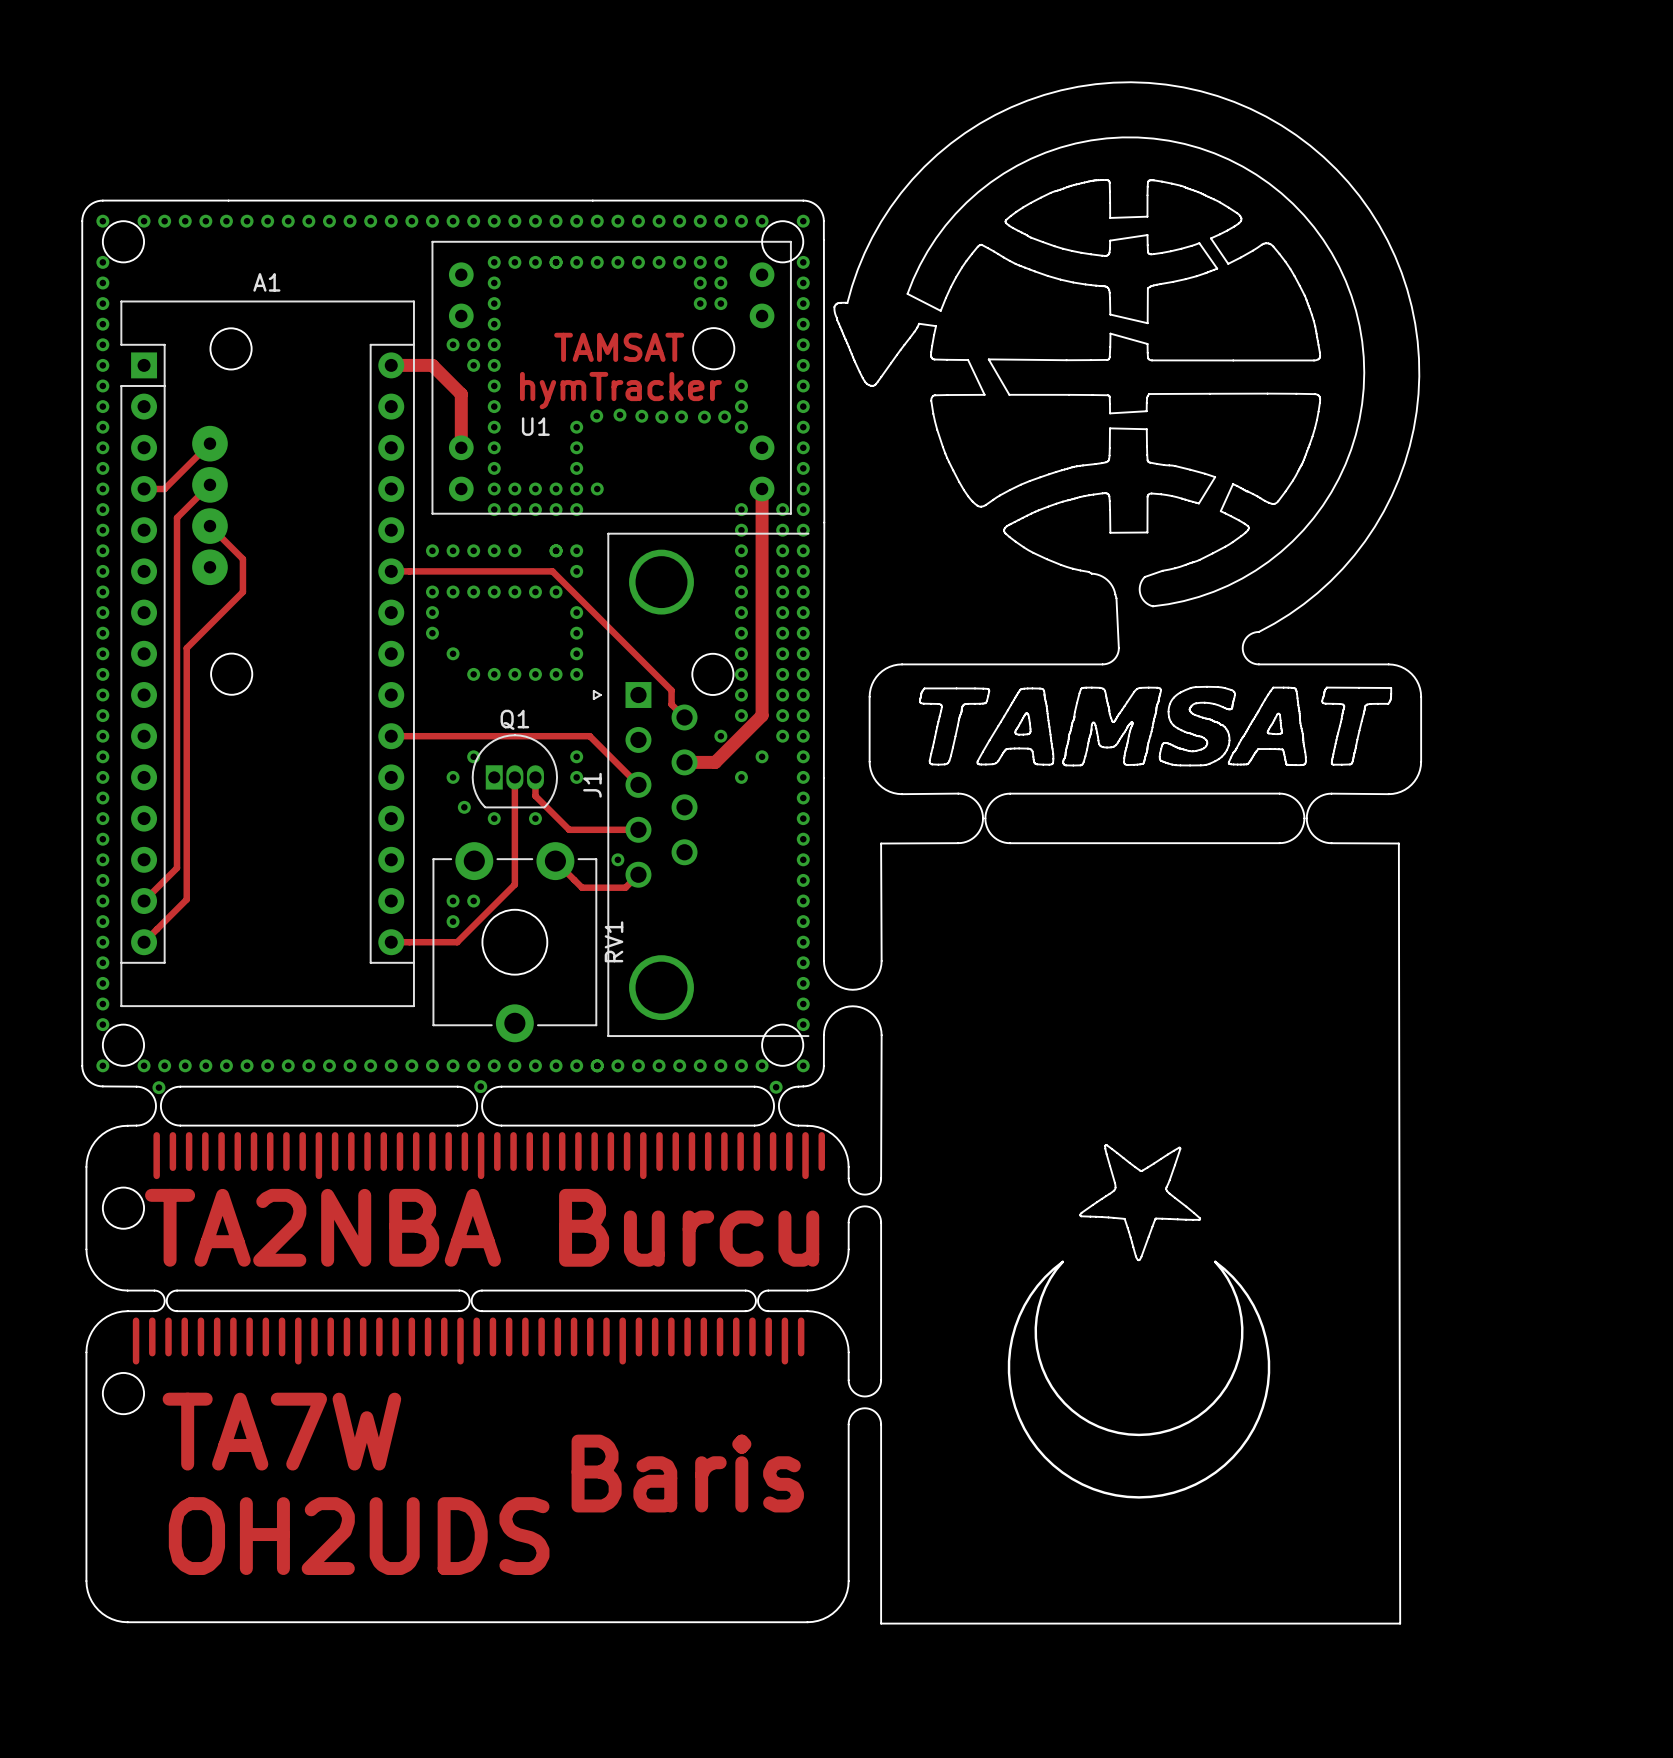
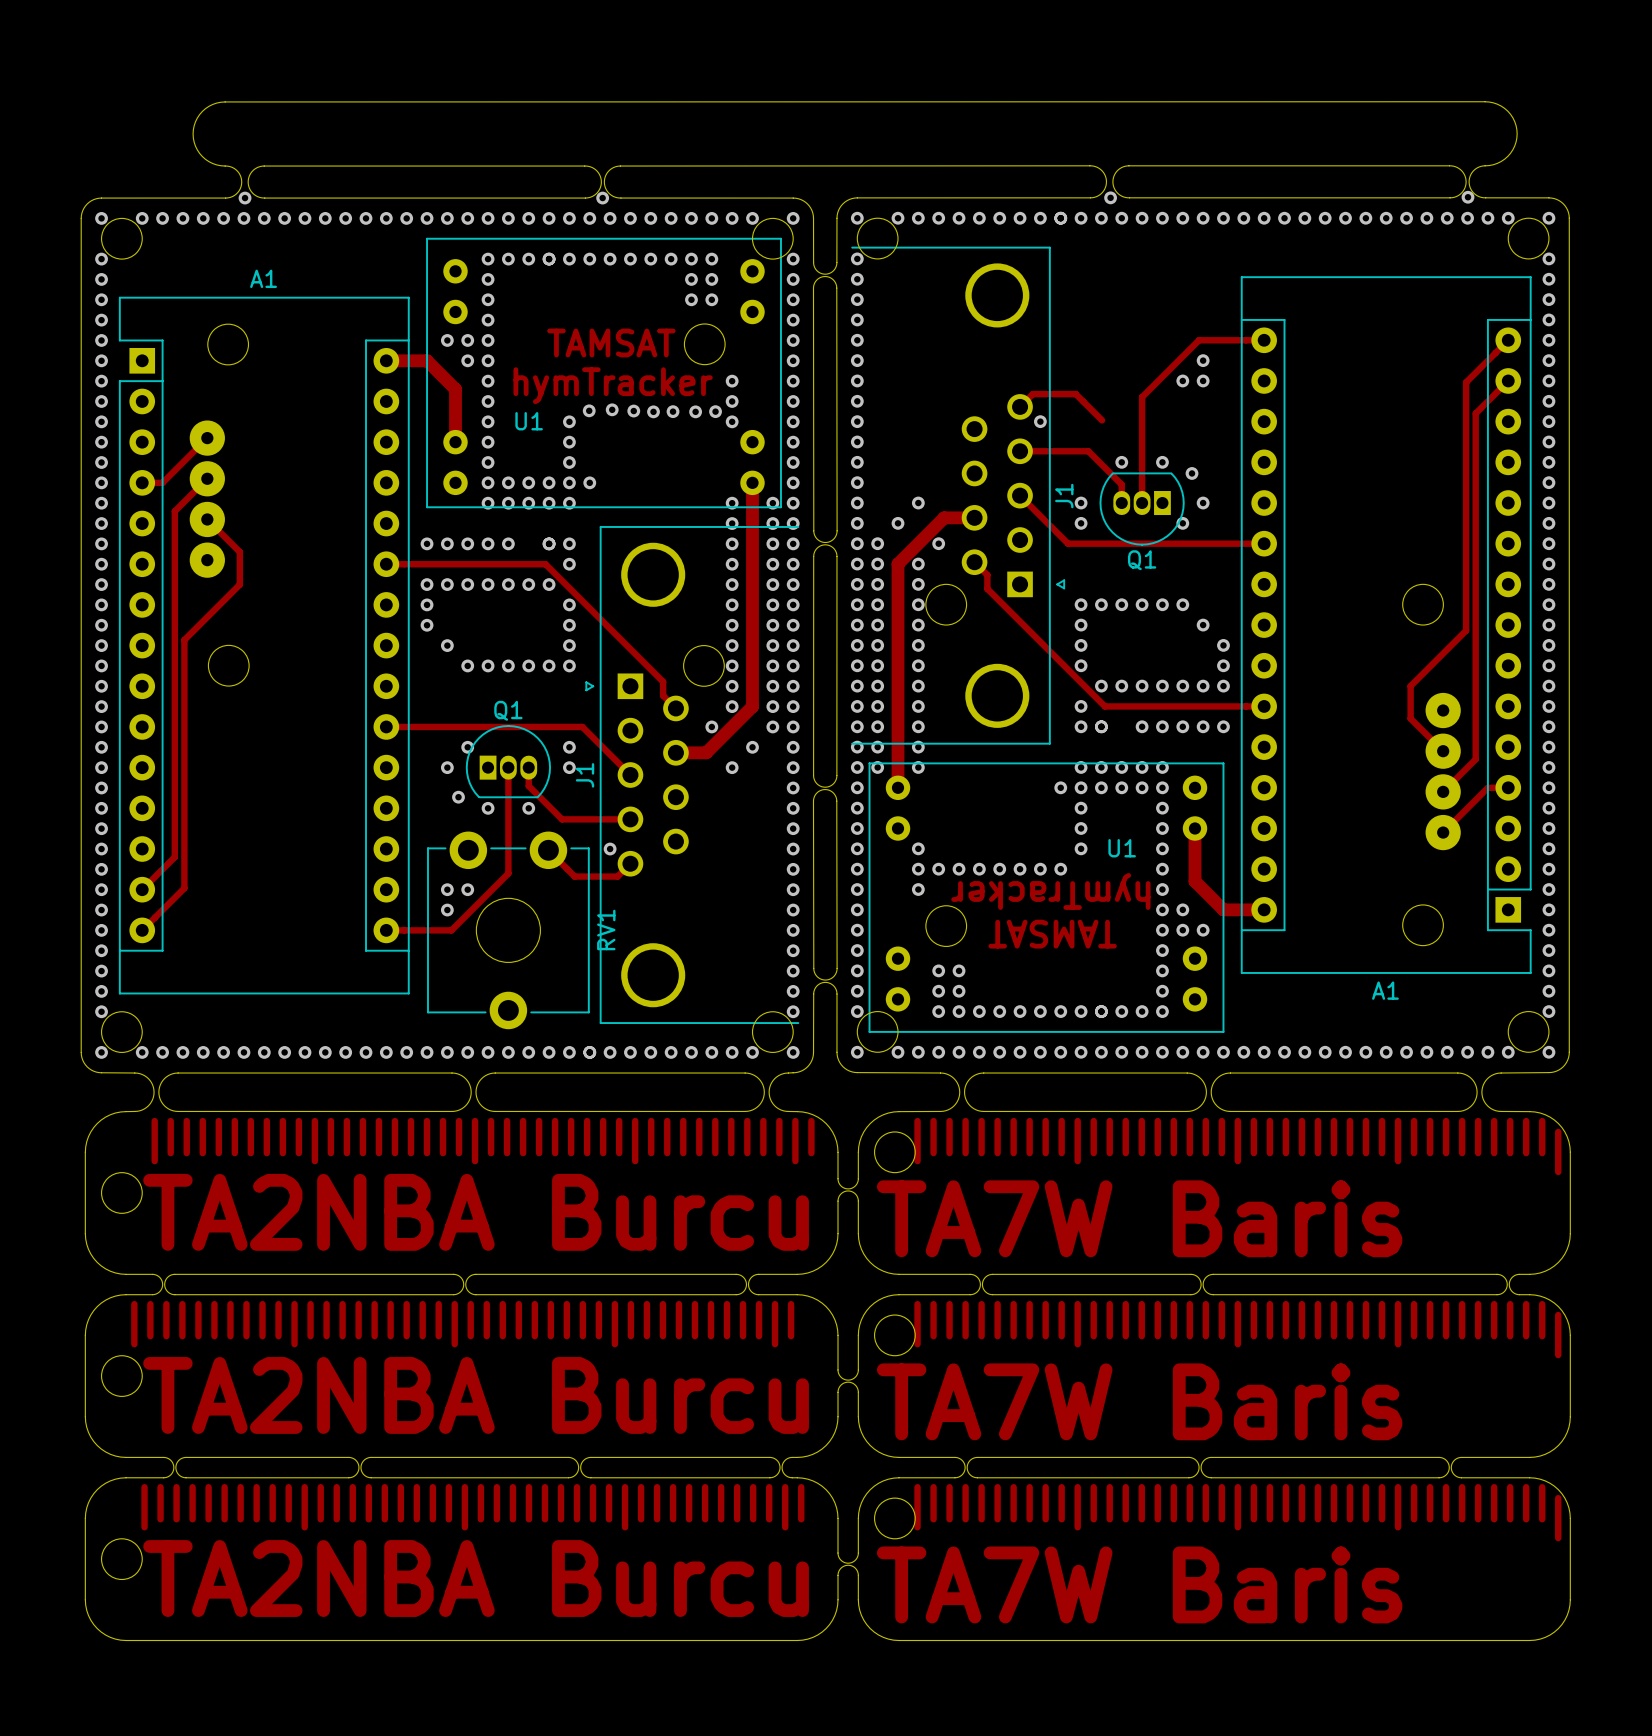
board edge: none -> (1128, 165) (1451, 165) (1461, 170) (1466, 183) (1460, 193) (1450, 197) (1127, 197) (1117, 192) (1112, 182) (1116, 171) (1128, 165)
via: none -> (1467, 197)
board edge: (228, 200) (268, 200) -> (585, 198) (597, 192) (601, 181) (595, 169) (584, 166) (262, 166) (252, 171) (248, 182) (252, 192) (264, 198)
board edge: none -> (225, 198) (233, 196) (238, 190) (241, 181) (239, 174) (232, 167) (216, 164) (205, 159) (195, 146) (193, 133) (194, 125) (199, 114) (209, 106) (220, 102) (1485, 101) (1497, 104) (1507, 111) (1516, 125) (1517, 133) (1514, 146) (1507, 156) (1501, 161) (1474, 169) (1469, 178) (1471, 189) (1476, 195) (1483, 197) (1554, 198) (1565, 205) (1569, 218) (1569, 1052) (1566, 1062) (1556, 1071) (1496, 1073) (1485, 1080) (1481, 1092) (1485, 1103) (1493, 1109) (1534, 1111) (1549, 1117) (1561, 1127) (1568, 1141) (1570, 1233) (1567, 1249) (1558, 1262) (1549, 1268) (1534, 1274) (1515, 1275) (1510, 1279) (1509, 1284) (1510, 1289) (1515, 1293) (1534, 1295) (1549, 1300) (1558, 1306) (1567, 1319) (1570, 1335) (1570, 1416) (1568, 1427) (1561, 1441) (1545, 1454) (1529, 1457) (1460, 1457) (1453, 1461) (1451, 1467) (1454, 1474) (1460, 1477) (1540, 1479) (1554, 1486) (1561, 1493) (1569, 1513) (1569, 1605) (1564, 1620) (1554, 1632) (1540, 1639) (1529, 1640) (899, 1640) (883, 1637) (866, 1624) (858, 1605) (858, 1572) (854, 1567) (848, 1565) (841, 1567) (838, 1572) (837, 1605) (832, 1620) (817, 1635) (802, 1640) (126, 1640) (105, 1635) (90, 1620) (85, 1605) (85, 1561)
via: none -> (245, 198)
board edge: (592, 200) (803, 200) -> none
via: none -> (602, 198)
via: none -> (1110, 197)
round board edge: none -> [856, 217, 899, 260]
round board edge: none -> [1507, 217, 1550, 260]
board edge: (823, 221) (823, 239) -> (813, 218) (813, 265) (818, 272) (826, 274) (833, 270) (836, 263) (837, 212) (842, 203) (852, 198) (1092, 197) (1103, 190) (1106, 179) (1102, 170) (1091, 165) (620, 166) (609, 170) (604, 180) (608, 192) (619, 197) (793, 198)
via: none -> (857, 218)
via: none -> (898, 218)
via: none -> (918, 218)
via: none -> (938, 218)
via: none -> (959, 218)
via: none -> (979, 218)
via: none -> (999, 218)
via: none -> (1020, 218)
via: none -> (1040, 218)
via: none -> (1060, 218)
via: none -> (1081, 218)
via: none -> (1101, 218)
via: none -> (1121, 218)
via: none -> (1142, 218)
via: none -> (1162, 218)
via: none -> (1182, 218)
via: none -> (1203, 218)
via: none -> (1223, 218)
via: none -> (1243, 218)
via: none -> (1264, 218)
via: none -> (1284, 218)
via: none -> (1304, 218)
via: none -> (1325, 218)
via: none -> (1345, 218)
via: none -> (1365, 218)
via: none -> (1386, 218)
via: none -> (1406, 218)
via: none -> (1426, 218)
via: none -> (1447, 218)
via: none -> (1467, 218)
via: none -> (1487, 218)
via: none -> (1508, 218)
via: none -> (1548, 218)
board edge: (823, 239) (823, 960) (829, 978) (845, 988) (856, 989) (867, 985) (875, 978) (880, 968) (881, 843) (963, 842) (977, 833) (982, 821) (979, 805) (966, 794) (897, 793) (885, 789) (876, 781) (872, 774) (869, 761) (869, 692) (876, 677) (885, 668) (902, 664) (1102, 664) (1110, 662) (1116, 656) (1118, 648) (1116, 598) (1111, 584) (1100, 575) (1067, 567) (1033, 552) (1009, 537) (1004, 532) (1004, 528) (1031, 513) (1056, 503) (1080, 497) (1105, 493) (1109, 496) (1110, 532) (1147, 532) (1148, 494) (1166, 495) (1198, 503) (1215, 477) (1175, 466) (1148, 462) (1146, 429) (1109, 428) (1109, 455) (1107, 461) (1072, 467) (1029, 481) (999, 495) (983, 506) (978, 506) (972, 501) (959, 481) (945, 453) (935, 421) (931, 400) (934, 395) (984, 394) (968, 360) (932, 358) (931, 352) (936, 326) (919, 323) (875, 384) (869, 385) (865, 382) (859, 372) (834, 312) (836, 304) (847, 303) (857, 269) (872, 237) (890, 207) (912, 179) (950, 143) (979, 123) (1027, 100) (1061, 90) (1113, 82) (1148, 82) (1183, 87) (1234, 101) (1266, 116) (1310, 145) (1348, 182) (1369, 210) (1395, 256) (1407, 289) (1415, 323) (1419, 358) (1416, 411) (1409, 446) (1398, 479) (1374, 526) (1354, 555) (1330, 581) (1289, 614) (1258, 631) (1249, 635) (1243, 641) (1242, 648) (1247, 659) (1256, 664) (1397, 665) (1404, 668) (1414, 677) (1420, 692) (1420, 765) (1416, 777) (1411, 784) (1404, 789) (1392, 793) (1323, 795) (1310, 805) (1306, 818) (1312, 833) (1326, 842) (1398, 843) (1400, 1623) (881, 1623) (880, 1422) (876, 1413) (864, 1408) (853, 1413) (848, 1424) -> none
board edge: (981, 244) (1015, 263) (1047, 275) (1073, 282) (1106, 286) (1109, 291) (1110, 314) (1147, 323) (1147, 288) (1196, 276) (1217, 268) (1199, 243) (1170, 251) (1150, 254) (1147, 251) (1147, 235) (1110, 240) (1109, 253) (1102, 255) (1072, 250) (1042, 242) (1012, 227) (1006, 223) (1005, 220) (1022, 207) (1053, 191) (1076, 184) (1103, 180) (1109, 182) (1110, 217) (1147, 216) (1148, 182) (1151, 180) (1181, 185) (1198, 192) (1238, 214) (1241, 218) (1239, 222) (1210, 238) (1228, 263) (1263, 243) (1268, 243) (1273, 246) (1290, 268) (1305, 297) (1315, 326) (1320, 354) (1318, 359) (1151, 360) (1148, 357) (1147, 343) (1110, 333) (1109, 356) (1107, 359) (988, 359) (1009, 394) (1108, 395) (1110, 413) (1146, 411) (1149, 394) (1296, 393) (1315, 394) (1319, 396) (1317, 419) (1303, 460) (1292, 480) (1278, 501) (1273, 503) (1268, 502) (1233, 484) (1220, 511) (1244, 523) (1248, 526) (1248, 529) (1229, 544) (1199, 559) (1144, 577) (1140, 583) (1139, 592) (1142, 599) (1149, 604) (1152, 606) (1183, 601) (1228, 585) (1268, 561) (1303, 530) (1331, 492) (1351, 449) (1362, 404) (1363, 357) (1356, 310) (1339, 266) (1314, 227) (1281, 193) (1256, 174) (1228, 159) (1199, 148) (1169, 140) (1122, 137) (1091, 140) (1060, 147) (1017, 165) (990, 182) (966, 202) (945, 225) (927, 251) (907, 293) (940, 310) (962, 267) (980, 244) -> none
via: none -> (857, 258)
via: none -> (1548, 258)
via: none -> (857, 279)
via: none -> (1548, 279)
board edge: none -> (813, 288) (813, 530) (816, 538) (825, 542) (833, 539) (837, 530) (836, 288) (833, 280) (825, 276) (816, 280) (813, 288)
via: none -> (857, 299)
via: none -> (1548, 299)
via: none -> (857, 319)
via: none -> (1548, 319)
via: none -> (857, 340)
track: none -> (1264, 340) (1199, 340) (1142, 397) (1142, 503)
track: none -> (1508, 340) (1466, 382) (1466, 630) (1410, 686) (1410, 718) (1443, 751)
via: none -> (1548, 340)
via: none -> (857, 360)
via: none -> (1203, 360)
via: none -> (1548, 360)
via: none -> (857, 380)
via: none -> (1182, 380)
via: none -> (1203, 380)
track: none -> (1508, 380) (1475, 413) (1475, 759) (1443, 791)
via: none -> (1548, 380)
via: none -> (857, 401)
via: none -> (1548, 401)
track: none -> (1020, 406) (1032, 394) (1075, 394) (1102, 420)
via: none -> (857, 421)
via: none -> (1040, 421)
via: none -> (1548, 421)
via: none -> (857, 441)
via: none -> (1548, 441)
track: none -> (1020, 451) (1088, 451) (1121, 484) (1121, 503)
via: none -> (857, 462)
via: none -> (1121, 462)
via: none -> (1162, 462)
via: none -> (1548, 462)
via: none -> (1192, 473)
via: none -> (857, 482)
via: none -> (1548, 482)
J1: none -> (958, 495)
track: none -> (1020, 495) (1068, 543) (1264, 543)
via: none -> (857, 503)
via: none -> (918, 503)
via: none -> (1081, 503)
via: none -> (1203, 503)
via: none -> (1548, 503)
Q1: none -> (1142, 509)
track: none -> (974, 517) (944, 517) (898, 564) (898, 787)
via: none -> (857, 523)
via: none -> (898, 523)
via: none -> (1081, 523)
via: none -> (1182, 523)
via: none -> (1548, 523)
via: none -> (857, 543)
via: none -> (877, 543)
via: none -> (938, 543)
via: none -> (1548, 543)
board edge: none -> (813, 556) (813, 775) (817, 784) (825, 787) (833, 783) (836, 775) (836, 556) (834, 548) (825, 544) (817, 547) (813, 556)
track: none -> (974, 562) (987, 575) (987, 588) (1104, 706) (1264, 706)
via: none -> (857, 564)
via: none -> (877, 564)
via: none -> (918, 564)
via: none -> (1548, 564)
via: none -> (857, 584)
via: none -> (877, 584)
via: none -> (918, 584)
round board edge: none -> [925, 583, 967, 626]
round board edge: none -> [1402, 583, 1444, 626]
via: none -> (1548, 584)
via: none -> (857, 604)
via: none -> (877, 604)
via: none -> (918, 604)
via: none -> (1081, 604)
via: none -> (1101, 604)
via: none -> (1121, 604)
via: none -> (1142, 604)
via: none -> (1162, 604)
via: none -> (1182, 604)
via: none -> (1548, 604)
via: none -> (857, 625)
via: none -> (877, 625)
via: none -> (918, 625)
via: none -> (1081, 625)
via: none -> (1203, 625)
A1: none -> (1386, 625)
via: none -> (1548, 625)
via: none -> (857, 645)
via: none -> (877, 645)
via: none -> (918, 645)
via: none -> (1081, 645)
via: none -> (1223, 645)
via: none -> (1548, 645)
via: none -> (857, 665)
via: none -> (877, 665)
via: none -> (918, 665)
via: none -> (1081, 665)
via: none -> (1223, 665)
via: none -> (1548, 665)
board edge: (1207, 686) (1191, 687) (1178, 693) (1171, 700) (1168, 711) (1169, 719) (1173, 725) (1184, 731) (1203, 738) (1207, 741) (1206, 745) (1201, 749) (1191, 751) (1164, 743) (1160, 753) (1161, 760) (1175, 765) (1205, 764) (1219, 758) (1225, 751) (1229, 737) (1225, 727) (1217, 722) (1194, 714) (1189, 709) (1194, 703) (1204, 702) (1231, 709) (1234, 693) (1224, 688) (1207, 686) -> none
board edge: (1086, 687) (1104, 689) (1113, 722) (1137, 689) (1160, 689) (1143, 763) (1127, 765) (1124, 762) (1131, 722) (1116, 745) (1107, 747) (1099, 744) (1093, 722) (1082, 763) (1063, 764) (1079, 693) (1081, 688) (1086, 687) -> none
board edge: (1273, 687) (1233, 753) (1229, 763) (1247, 764) (1258, 749) (1282, 749) (1286, 764) (1301, 765) (1305, 763) (1295, 689) (1273, 687) -> none
board edge: (1326, 687) (1322, 702) (1344, 706) (1331, 763) (1350, 764) (1365, 706) (1369, 704) (1388, 703) (1390, 698) (1391, 688) (1326, 687) -> none
board edge: (924, 688) (921, 693) (920, 702) (939, 704) (941, 706) (929, 762) (932, 764) (945, 764) (950, 758) (962, 706) (965, 704) (985, 703) (989, 689) (924, 688) -> none
board edge: (1027, 688) (1021, 689) (1017, 693) (982, 751) (978, 763) (994, 763) (1006, 749) (1019, 748) (1031, 749) (1035, 763) (1052, 763) (1052, 751) (1043, 690) (1040, 688) (1027, 688) -> none
via: none -> (857, 686)
via: none -> (877, 686)
via: none -> (918, 686)
via: none -> (1101, 686)
via: none -> (1121, 686)
via: none -> (1142, 686)
via: none -> (1162, 686)
via: none -> (1182, 686)
via: none -> (1203, 686)
via: none -> (1223, 686)
via: none -> (1548, 686)
board edge: (1026, 713) (1028, 716) (1030, 732) (1016, 734) (1015, 730) (1026, 713) -> none
board edge: (1278, 713) (1281, 732) (1268, 733) (1269, 728) (1278, 713) -> none
via: none -> (857, 706)
via: none -> (877, 706)
via: none -> (918, 706)
via: none -> (1081, 706)
via: none -> (1548, 706)
via: none -> (857, 726)
via: none -> (877, 726)
via: none -> (918, 726)
via: none -> (1081, 726)
via: none -> (1101, 726)
via: none -> (1142, 726)
via: none -> (1162, 726)
via: none -> (1182, 726)
via: none -> (1203, 726)
via: none -> (1223, 726)
via: none -> (1548, 726)
via: none -> (857, 747)
via: none -> (877, 747)
via: none -> (918, 747)
via: none -> (1548, 747)
via: none -> (857, 767)
via: none -> (877, 767)
via: none -> (918, 767)
via: none -> (1081, 767)
via: none -> (1101, 767)
via: none -> (1121, 767)
via: none -> (1142, 767)
via: none -> (1162, 767)
via: none -> (1548, 767)
part: none -> (1443, 771)
board edge: (1279, 793) (1007, 793) (996, 797) (990, 802) (986, 810) (985, 821) (992, 835) (1007, 843) (1282, 843) (1292, 839) (1299, 833) (1303, 826) (1304, 815) (1297, 800) (1287, 794) (1279, 793) -> none
via: none -> (857, 787)
via: none -> (1060, 787)
via: none -> (1081, 787)
via: none -> (1101, 787)
via: none -> (1121, 787)
via: none -> (1142, 787)
via: none -> (1162, 787)
track: none -> (1508, 787) (1487, 787) (1443, 832)
via: none -> (1548, 787)
board edge: none -> (813, 801) (813, 969) (817, 977) (826, 979) (834, 976) (837, 968) (836, 799) (832, 792) (825, 789) (817, 792) (813, 801)
via: none -> (857, 808)
via: none -> (1081, 808)
via: none -> (1162, 808)
via: none -> (1548, 808)
via: none -> (857, 828)
via: none -> (1081, 828)
via: none -> (1162, 828)
track: none -> (1195, 828) (1195, 881) (1223, 909) (1264, 909)
via: none -> (1548, 828)
via: none -> (857, 848)
via: none -> (918, 848)
via: none -> (1081, 848)
via: none -> (1162, 848)
via: none -> (1548, 848)
via: none -> (857, 869)
via: none -> (918, 869)
via: none -> (938, 869)
via: none -> (959, 869)
via: none -> (979, 869)
via: none -> (999, 869)
via: none -> (1020, 869)
via: none -> (1040, 869)
via: none -> (1060, 869)
via: none -> (1162, 869)
via: none -> (1548, 869)
via: none -> (857, 889)
via: none -> (918, 889)
via: none -> (1162, 889)
via: none -> (1548, 889)
text: none -> hymTracker (1050, 891)
U1: none -> (1046, 897)
round board edge: none -> [925, 905, 967, 947]
round board edge: none -> [1402, 904, 1444, 947]
via: none -> (857, 909)
via: none -> (1162, 909)
via: none -> (1182, 909)
via: none -> (1548, 909)
via: none -> (857, 930)
via: none -> (1162, 930)
via: none -> (1182, 930)
via: none -> (1203, 930)
via: none -> (1548, 930)
text: none -> TAMSAT (1052, 934)
via: none -> (857, 950)
via: none -> (1162, 950)
via: none -> (1548, 950)
via: none -> (857, 970)
via: none -> (938, 970)
via: none -> (959, 970)
via: none -> (1162, 970)
via: none -> (1548, 970)
via: none -> (857, 991)
via: none -> (938, 991)
via: none -> (959, 991)
via: none -> (1162, 991)
via: none -> (1548, 991)
round board edge: none -> [856, 1011, 899, 1053]
via: none -> (857, 1011)
via: none -> (938, 1011)
via: none -> (959, 1011)
via: none -> (979, 1011)
via: none -> (999, 1011)
via: none -> (1020, 1011)
via: none -> (1040, 1011)
via: none -> (1060, 1011)
via: none -> (1081, 1011)
via: none -> (1101, 1011)
via: none -> (1121, 1011)
via: none -> (1142, 1011)
via: none -> (1162, 1011)
round board edge: none -> [1507, 1011, 1550, 1053]
via: none -> (1548, 1011)
board edge: (823, 1065) (824, 1031) (832, 1014) (841, 1008) (852, 1006) (863, 1008) (873, 1014) (879, 1024) (881, 1035) (880, 1180) (876, 1189) (864, 1194) (853, 1189) (848, 1178) -> (813, 1052) (814, 991) (819, 983) (828, 982) (834, 986) (836, 991) (837, 1054) (839, 1062) (844, 1068) (857, 1072) (943, 1073) (952, 1076) (959, 1087) (957, 1101) (947, 1109) (893, 1111) (883, 1114) (870, 1123) (859, 1141) (858, 1180) (853, 1187) (845, 1188) (839, 1183) (838, 1163)
via: none -> (857, 1052)
via: none -> (898, 1052)
via: none -> (918, 1052)
via: none -> (938, 1052)
via: none -> (959, 1052)
via: none -> (979, 1052)
via: none -> (999, 1052)
via: none -> (1020, 1052)
via: none -> (1040, 1052)
via: none -> (1060, 1052)
via: none -> (1081, 1052)
via: none -> (1101, 1052)
via: none -> (1121, 1052)
via: none -> (1142, 1052)
via: none -> (1162, 1052)
via: none -> (1182, 1052)
via: none -> (1203, 1052)
via: none -> (1223, 1052)
via: none -> (1243, 1052)
via: none -> (1264, 1052)
via: none -> (1284, 1052)
via: none -> (1304, 1052)
via: none -> (1325, 1052)
via: none -> (1345, 1052)
via: none -> (1365, 1052)
via: none -> (1386, 1052)
via: none -> (1406, 1052)
via: none -> (1426, 1052)
via: none -> (1447, 1052)
via: none -> (1467, 1052)
via: none -> (1487, 1052)
via: none -> (1508, 1052)
via: none -> (1548, 1052)
via: (480, 1086) -> none
board edge: none -> (983, 1073) (1189, 1073) (1202, 1080) (1206, 1094) (1200, 1105) (1189, 1111) (981, 1111) (968, 1103) (964, 1092) (970, 1078) (983, 1073)
board edge: none -> (1230, 1073) (1460, 1073) (1473, 1080) (1476, 1094) (1471, 1105) (1460, 1111) (1227, 1111) (1215, 1103) (1211, 1092) (1216, 1078) (1230, 1073)
via: (158, 1087) -> none
via: (776, 1087) -> none
track: none -> (917, 1121) (917, 1161)
track: none -> (933, 1121) (933, 1153)
track: none -> (949, 1121) (949, 1153)
track: none -> (965, 1121) (965, 1153)
track: none -> (981, 1121) (981, 1153)
track: none -> (997, 1121) (997, 1153)
track: none -> (1013, 1121) (1013, 1153)
track: none -> (1029, 1121) (1029, 1153)
track: none -> (1045, 1121) (1045, 1153)
track: none -> (1061, 1121) (1061, 1153)
track: none -> (1077, 1121) (1077, 1161)
track: none -> (1093, 1121) (1093, 1153)
track: none -> (1109, 1121) (1109, 1153)
track: none -> (1125, 1121) (1125, 1153)
track: none -> (1141, 1121) (1141, 1153)
track: none -> (1157, 1121) (1157, 1153)
track: none -> (1173, 1121) (1173, 1153)
track: none -> (1189, 1121) (1189, 1153)
track: none -> (1205, 1121) (1205, 1153)
track: none -> (1221, 1121) (1221, 1153)
track: none -> (1237, 1121) (1237, 1161)
track: none -> (1253, 1121) (1253, 1153)
track: none -> (1269, 1121) (1269, 1153)
track: none -> (1285, 1121) (1285, 1153)
track: none -> (1301, 1121) (1301, 1153)
track: none -> (1317, 1121) (1317, 1153)
track: none -> (1333, 1121) (1333, 1153)
track: none -> (1350, 1121) (1350, 1153)
track: none -> (1366, 1121) (1366, 1153)
track: none -> (1382, 1121) (1382, 1153)
track: none -> (1398, 1121) (1398, 1161)
track: none -> (1414, 1121) (1414, 1153)
track: none -> (1430, 1121) (1430, 1153)
track: none -> (1446, 1121) (1446, 1153)
track: none -> (1462, 1121) (1462, 1153)
track: none -> (1478, 1121) (1478, 1153)
track: none -> (1494, 1121) (1494, 1153)
track: none -> (1510, 1121) (1510, 1153)
track: none -> (1526, 1121) (1526, 1153)
track: none -> (1542, 1121) (1542, 1153)
round board edge: none -> [874, 1131, 916, 1174]
board edge: (1106, 1145) (1141, 1170) (1180, 1148) (1166, 1189) (1200, 1219) (1155, 1218) (1139, 1260) (1135, 1256) (1124, 1218) (1080, 1215) (1115, 1188) (1105, 1151) (1105, 1146) (1105, 1145) (1106, 1145) -> none
track: none -> (1558, 1131) (1558, 1172)
board edge: (848, 1222) (853, 1211) (864, 1206) (876, 1211) (881, 1222) (880, 1384) (874, 1393) (862, 1396) (853, 1391) (848, 1380) -> (838, 1207) (838, 1197) (843, 1192) (850, 1191) (856, 1196) (859, 1244) (866, 1258) (878, 1268) (899, 1274) (971, 1274) (978, 1278) (980, 1284) (978, 1290) (971, 1294) (899, 1294) (878, 1300) (866, 1310) (859, 1324) (858, 1371) (856, 1376) (849, 1380) (841, 1378) (838, 1372) (838, 1362)
text: none -> TA7W Baris (1139, 1218)
board edge: (1062, 1261) (1045, 1277) (1030, 1295) (1019, 1315) (1012, 1338) (1009, 1361) (1010, 1384) (1019, 1418) (1030, 1438) (1044, 1457) (1072, 1478) (1093, 1489) (1115, 1495) (1150, 1496) (1173, 1492) (1195, 1484) (1215, 1472) (1233, 1457) (1247, 1438) (1258, 1418) (1265, 1396) (1269, 1372) (1267, 1349) (1262, 1326) (1247, 1295) (1232, 1277) (1215, 1261) (1227, 1278) (1236, 1297) (1241, 1317) (1242, 1338) (1238, 1358) (1231, 1377) (1213, 1403) (1197, 1416) (1169, 1430) (1139, 1434) (1118, 1432) (1089, 1422) (1072, 1410) (1051, 1386) (1042, 1368) (1035, 1338) (1038, 1307) (1045, 1287) (1062, 1261) -> none
board edge: none -> (992, 1274) (1190, 1274) (1198, 1277) (1201, 1284) (1198, 1291) (1190, 1294) (992, 1294) (985, 1291) (982, 1284) (985, 1277) (992, 1274)
board edge: none -> (1213, 1274) (1497, 1274) (1504, 1277) (1507, 1284) (1504, 1291) (1497, 1294) (1213, 1294) (1206, 1291) (1203, 1284) (1206, 1277) (1213, 1274)
track: none -> (917, 1304) (917, 1344)
track: none -> (933, 1304) (933, 1336)
track: none -> (949, 1304) (949, 1336)
track: none -> (965, 1304) (965, 1336)
track: none -> (981, 1304) (981, 1336)
track: none -> (997, 1304) (997, 1336)
track: none -> (1013, 1304) (1013, 1336)
track: none -> (1029, 1304) (1029, 1336)
track: none -> (1045, 1304) (1045, 1336)
track: none -> (1061, 1304) (1061, 1336)
track: none -> (1077, 1304) (1077, 1344)
track: none -> (1093, 1304) (1093, 1336)
track: none -> (1109, 1304) (1109, 1336)
track: none -> (1125, 1304) (1125, 1336)
track: none -> (1141, 1304) (1141, 1336)
track: none -> (1157, 1304) (1157, 1336)
track: none -> (1173, 1304) (1173, 1336)
track: none -> (1189, 1304) (1189, 1336)
track: none -> (1205, 1304) (1205, 1336)
track: none -> (1221, 1304) (1221, 1336)
track: none -> (1237, 1304) (1237, 1344)
track: none -> (1253, 1304) (1253, 1336)
track: none -> (1269, 1304) (1269, 1336)
track: none -> (1285, 1304) (1285, 1336)
track: none -> (1301, 1304) (1301, 1336)
track: none -> (1317, 1304) (1317, 1336)
track: none -> (1333, 1304) (1333, 1336)
track: none -> (1350, 1304) (1350, 1336)
track: none -> (1366, 1304) (1366, 1336)
track: none -> (1382, 1304) (1382, 1336)
track: none -> (1398, 1304) (1398, 1344)
track: none -> (1414, 1304) (1414, 1336)
track: none -> (1430, 1304) (1430, 1336)
track: none -> (1446, 1304) (1446, 1336)
track: none -> (1462, 1304) (1462, 1336)
track: none -> (1478, 1304) (1478, 1336)
track: none -> (1494, 1304) (1494, 1336)
track: none -> (1510, 1304) (1510, 1336)
track: none -> (1526, 1304) (1526, 1336)
track: none -> (1542, 1304) (1542, 1336)
round board edge: none -> [874, 1314, 916, 1357]
track: none -> (1558, 1315) (1558, 1355)
text: none -> TA2NBA Burcu (476, 1395)
text: none -> TA7W Baris (1139, 1401)
text: TA7W (281, 1431) -> none
board edge: (86, 1434) (86, 1537) -> (85, 1416) (90, 1437) (105, 1451) (120, 1457) (166, 1457) (171, 1461) (173, 1467) (171, 1473) (166, 1477) (120, 1478) (105, 1483) (90, 1498) (85, 1518)
board edge: (848, 1434) (848, 1537) -> (838, 1416) (834, 1432) (826, 1445) (812, 1454) (787, 1458) (782, 1467) (787, 1476) (812, 1480) (826, 1489) (834, 1502) (838, 1518)
text: Baris (687, 1473) -> none
board edge: none -> (186, 1457) (348, 1457) (355, 1460) (358, 1467) (355, 1474) (348, 1477) (186, 1477) (178, 1474) (175, 1467) (178, 1460) (186, 1457)
board edge: none -> (371, 1457) (568, 1457) (575, 1460) (578, 1467) (575, 1474) (568, 1477) (371, 1477) (363, 1474) (360, 1467) (363, 1460) (371, 1457)
board edge: none -> (590, 1457) (769, 1457) (777, 1460) (780, 1467) (777, 1474) (769, 1477) (590, 1477) (583, 1474) (580, 1467) (583, 1460) (590, 1457)
board edge: none -> (977, 1457) (1188, 1457) (1196, 1460) (1199, 1467) (1196, 1474) (1188, 1477) (977, 1477) (970, 1474) (967, 1467) (970, 1460) (977, 1457)
board edge: none -> (1211, 1457) (1439, 1457) (1446, 1460) (1449, 1467) (1446, 1474) (1439, 1477) (1211, 1477) (1204, 1474) (1201, 1467) (1204, 1460) (1211, 1457)
track: none -> (144, 1487) (144, 1527)
track: none -> (160, 1487) (160, 1519)
track: none -> (176, 1487) (176, 1519)
track: none -> (192, 1487) (192, 1519)
track: none -> (208, 1487) (208, 1519)
track: none -> (224, 1487) (224, 1519)
track: none -> (240, 1487) (240, 1519)
track: none -> (256, 1487) (256, 1519)
track: none -> (272, 1487) (272, 1519)
track: none -> (288, 1487) (288, 1519)
track: none -> (304, 1487) (304, 1527)
track: none -> (320, 1487) (320, 1519)
track: none -> (336, 1487) (336, 1519)
track: none -> (352, 1487) (352, 1519)
track: none -> (368, 1487) (368, 1519)
track: none -> (384, 1487) (384, 1519)
track: none -> (400, 1487) (400, 1519)
track: none -> (416, 1487) (416, 1519)
track: none -> (432, 1487) (432, 1519)
track: none -> (448, 1487) (448, 1519)
track: none -> (464, 1487) (464, 1527)
track: none -> (480, 1487) (480, 1519)
track: none -> (496, 1487) (496, 1519)
track: none -> (512, 1487) (512, 1519)
track: none -> (528, 1487) (528, 1519)
track: none -> (544, 1487) (544, 1519)
track: none -> (560, 1487) (560, 1519)
track: none -> (577, 1487) (577, 1519)
track: none -> (593, 1487) (593, 1519)
track: none -> (609, 1487) (609, 1519)
track: none -> (625, 1487) (625, 1527)
track: none -> (641, 1487) (641, 1519)
track: none -> (657, 1487) (657, 1519)
track: none -> (673, 1487) (673, 1519)
track: none -> (689, 1487) (689, 1519)
track: none -> (705, 1487) (705, 1519)
track: none -> (721, 1487) (721, 1519)
track: none -> (737, 1487) (737, 1519)
track: none -> (753, 1487) (753, 1519)
track: none -> (769, 1487) (769, 1519)
track: none -> (785, 1487) (785, 1527)
track: none -> (801, 1487) (801, 1519)
track: none -> (917, 1487) (917, 1527)
track: none -> (933, 1487) (933, 1519)
track: none -> (949, 1487) (949, 1519)
track: none -> (965, 1487) (965, 1519)
track: none -> (981, 1487) (981, 1519)
track: none -> (997, 1487) (997, 1519)
track: none -> (1013, 1487) (1013, 1519)
track: none -> (1029, 1487) (1029, 1519)
track: none -> (1045, 1487) (1045, 1519)
track: none -> (1061, 1487) (1061, 1519)
track: none -> (1077, 1487) (1077, 1527)
track: none -> (1093, 1487) (1093, 1519)
track: none -> (1109, 1487) (1109, 1519)
track: none -> (1125, 1487) (1125, 1519)
track: none -> (1141, 1487) (1141, 1519)
track: none -> (1157, 1487) (1157, 1519)
track: none -> (1173, 1487) (1173, 1519)
track: none -> (1189, 1487) (1189, 1519)
track: none -> (1205, 1487) (1205, 1519)
track: none -> (1221, 1487) (1221, 1519)
track: none -> (1237, 1487) (1237, 1527)
track: none -> (1253, 1487) (1253, 1519)
track: none -> (1269, 1487) (1269, 1519)
track: none -> (1285, 1487) (1285, 1519)
track: none -> (1301, 1487) (1301, 1519)
track: none -> (1317, 1487) (1317, 1519)
track: none -> (1333, 1487) (1333, 1519)
track: none -> (1350, 1487) (1350, 1519)
track: none -> (1366, 1487) (1366, 1519)
track: none -> (1382, 1487) (1382, 1519)
track: none -> (1398, 1487) (1398, 1527)
track: none -> (1414, 1487) (1414, 1519)
track: none -> (1430, 1487) (1430, 1519)
track: none -> (1446, 1487) (1446, 1519)
track: none -> (1462, 1487) (1462, 1519)
track: none -> (1478, 1487) (1478, 1519)
track: none -> (1494, 1487) (1494, 1519)
track: none -> (1510, 1487) (1510, 1519)
track: none -> (1526, 1487) (1526, 1519)
track: none -> (1542, 1487) (1542, 1519)
round board edge: none -> [874, 1497, 916, 1540]
track: none -> (1558, 1498) (1558, 1538)
text: OH2UDS (359, 1536) -> none
round board edge: none -> [101, 1538, 143, 1580]
board edge: (848, 1572) (847, 1591) (840, 1606) (828, 1616) (807, 1622) (127, 1622) (111, 1619) (98, 1610) (89, 1596) (86, 1581) -> (838, 1553) (840, 1559) (845, 1562) (852, 1562) (856, 1558) (859, 1507) (863, 1498) (874, 1486) (893, 1478) (957, 1477) (963, 1473) (965, 1467) (963, 1461) (957, 1457) (893, 1457) (874, 1449) (866, 1441) (859, 1427) (858, 1391) (852, 1382) (844, 1382) (839, 1387) (838, 1406)
text: none -> TA2NBA Burcu (476, 1578)
text: none -> TA7W Baris (1139, 1584)

